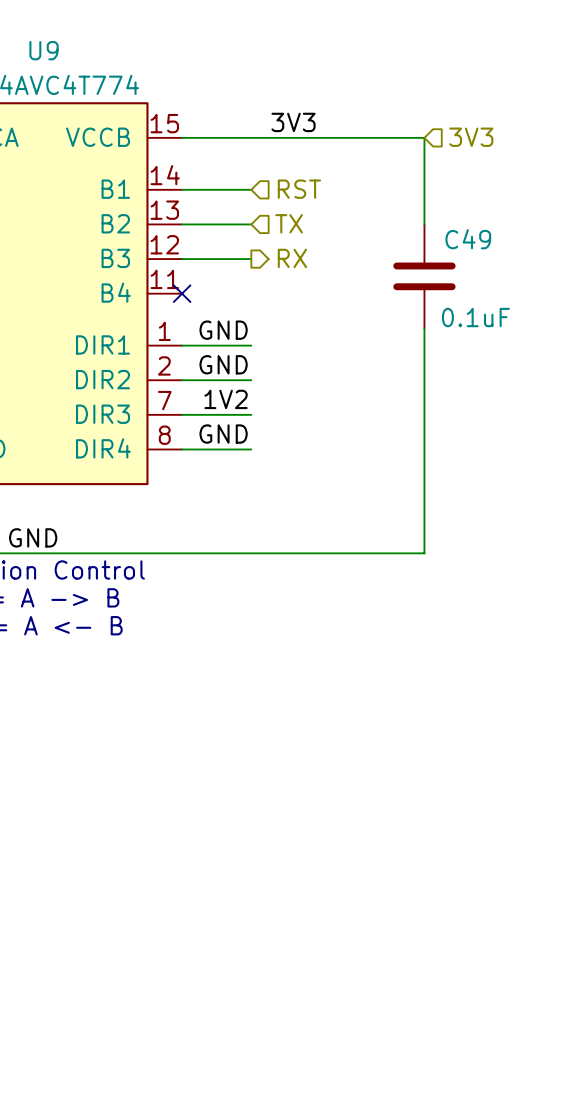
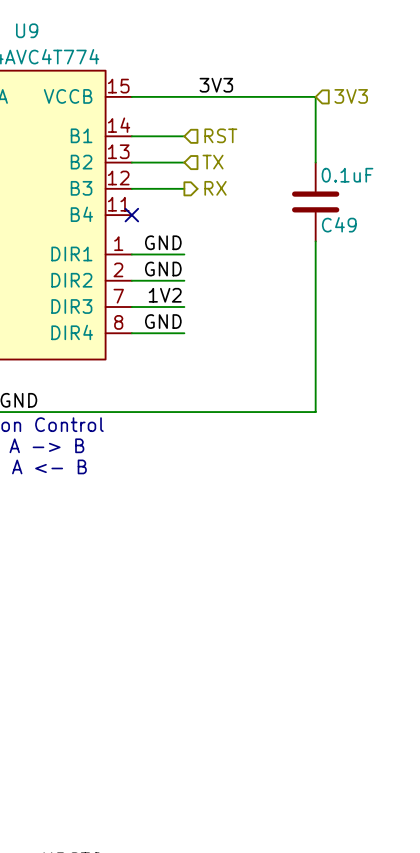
C49 name position: C49 (468, 239) -> C49 (339, 224)
C49 value position: 0.1uF (475, 317) -> 0.1uF (347, 175)

